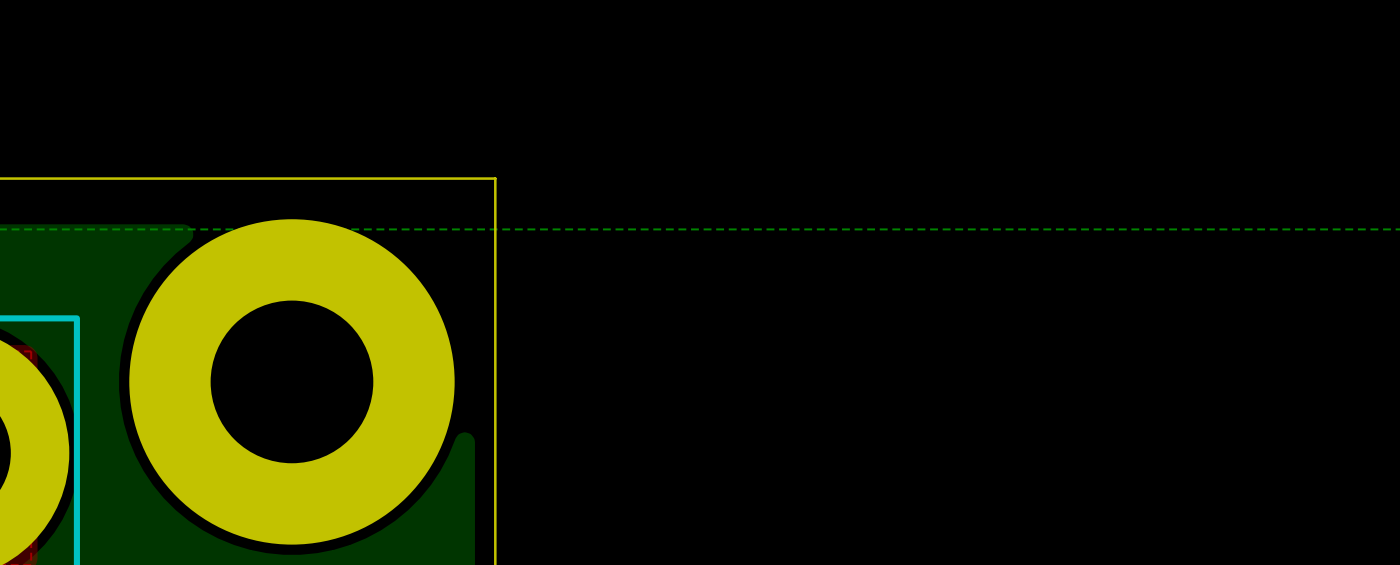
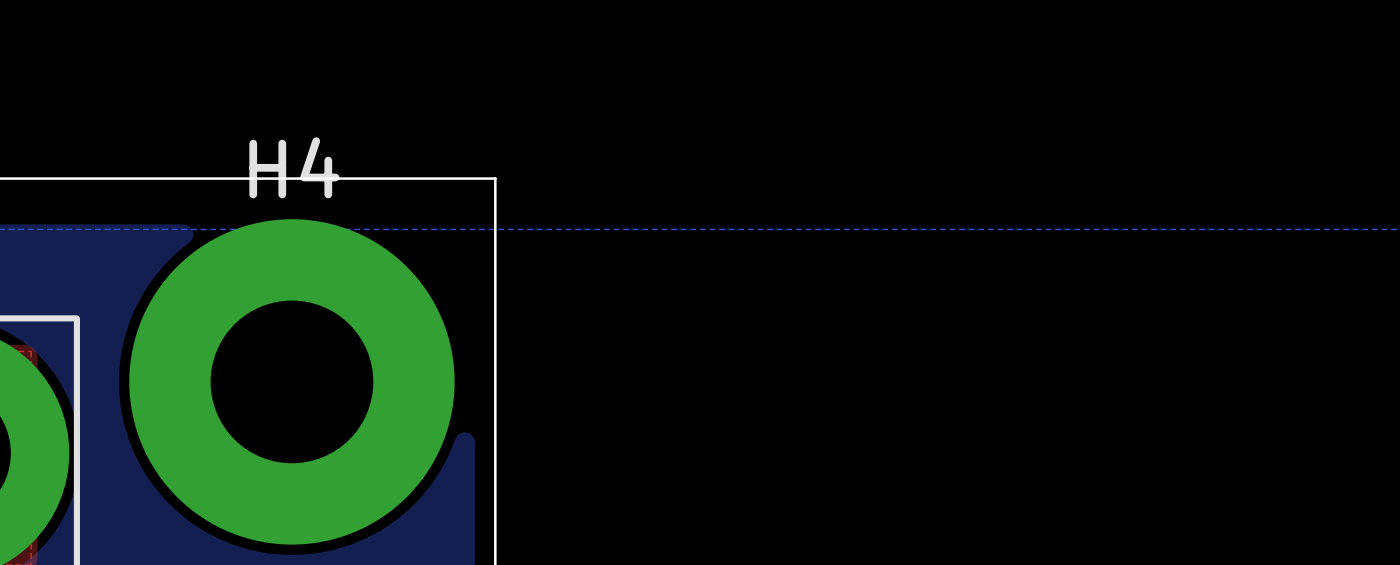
H4 name: none -> H4 (294, 167)

